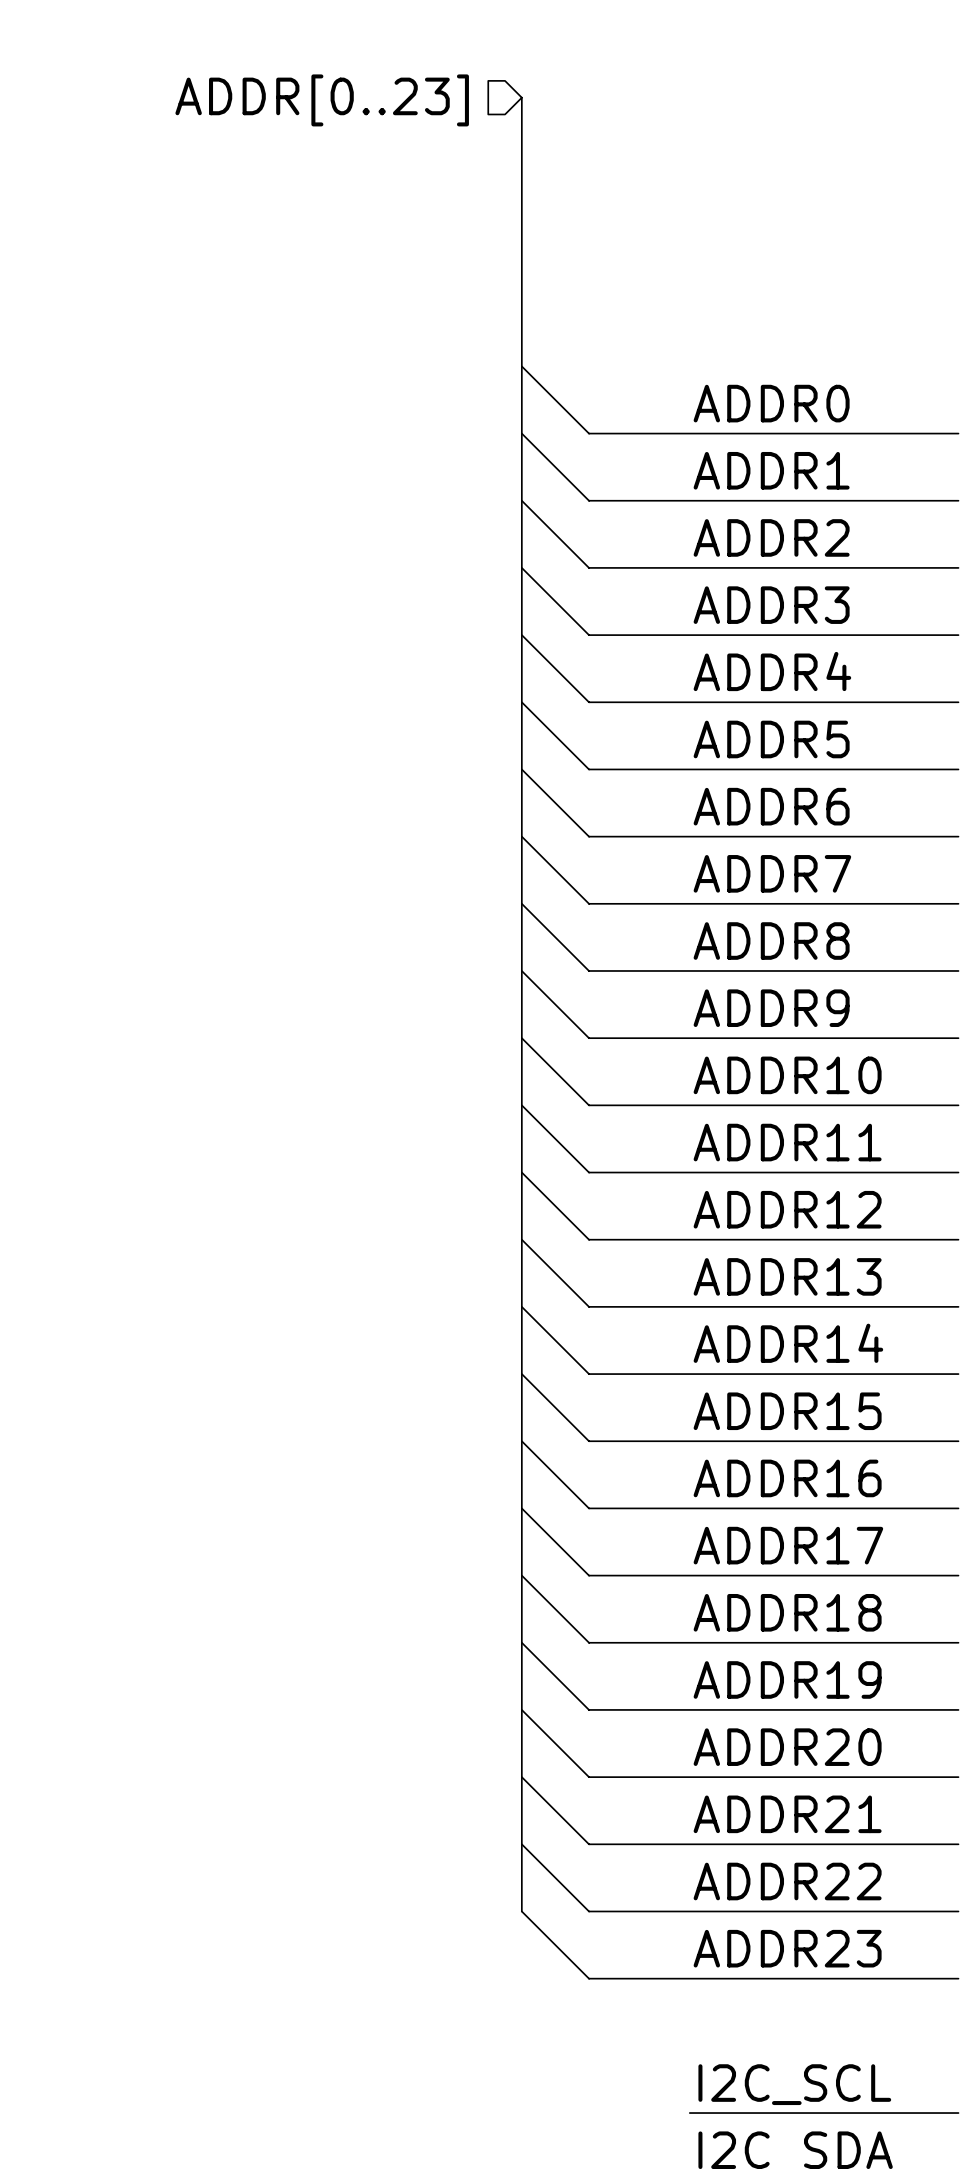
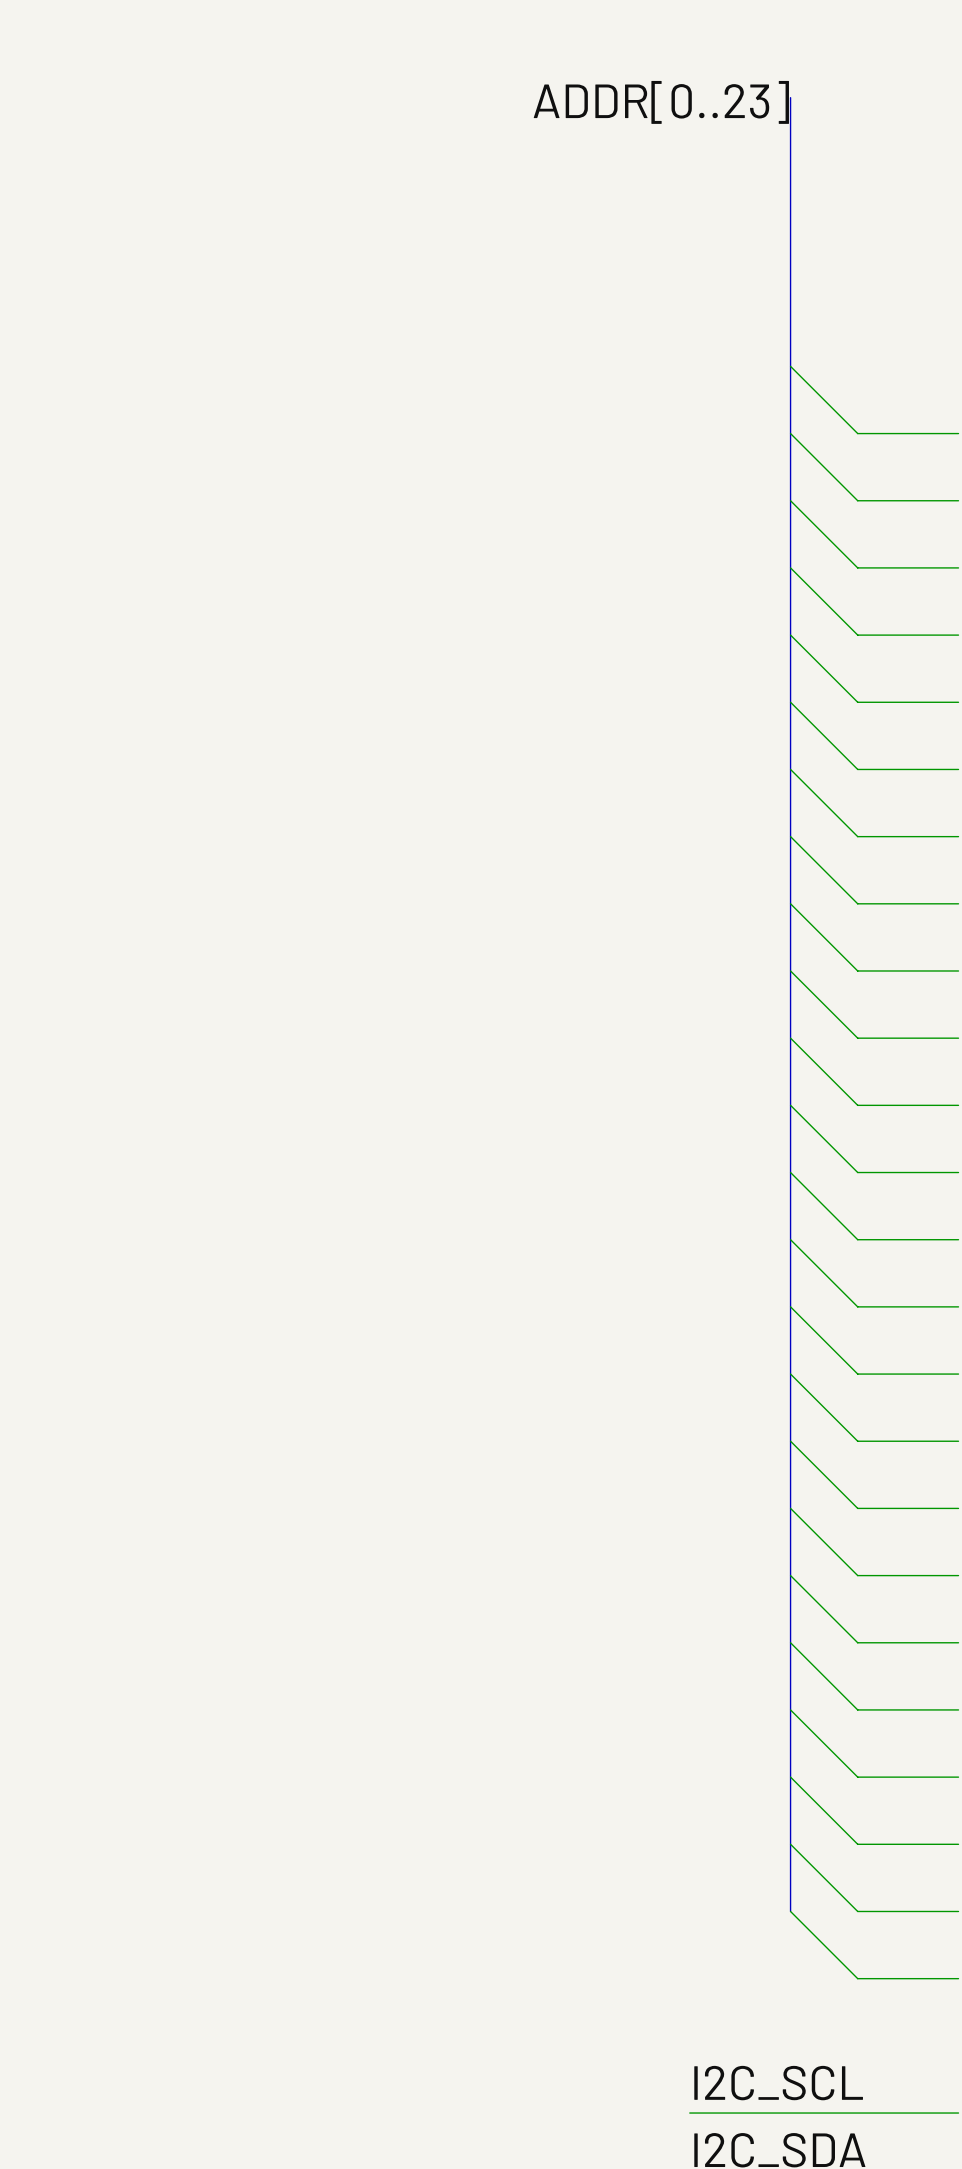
bus: (521, 97) (521, 1911) -> (790, 97) (790, 1911)
hierarchical label: ADDR[0..23] (322, 100) -> none
label: none -> ADDR[0..23] (661, 102)
wire: (521, 366) (589, 433) (857, 433) -> (790, 366) (857, 433)
label: ADDR0 (771, 403) -> none
wire: (521, 433) (589, 500) (857, 500) -> (790, 433) (857, 500)
label: ADDR1 (771, 470) -> none
wire: (521, 500) (589, 567) (857, 567) -> (790, 500) (857, 567)
label: ADDR2 (771, 537) -> none
wire: (521, 567) (589, 635) (857, 635) -> (790, 567) (857, 635)
label: ADDR3 (771, 605) -> none
wire: (521, 635) (589, 702) (857, 702) -> (790, 635) (857, 702)
label: ADDR4 (772, 671) -> none
wire: (521, 702) (589, 769) (857, 769) -> (790, 702) (857, 769)
label: ADDR5 (771, 739) -> none
wire: (521, 769) (589, 836) (857, 836) -> (790, 769) (857, 836)
label: ADDR6 (771, 806) -> none
wire: (521, 836) (589, 903) (857, 903) -> (790, 836) (857, 903)
label: ADDR7 (772, 873) -> none
wire: (521, 903) (589, 970) (857, 970) -> (790, 903) (857, 970)
label: ADDR8 (771, 941) -> none
wire: (521, 970) (589, 1038) (857, 1038) -> (790, 970) (857, 1038)
label: ADDR9 (771, 1008) -> none
wire: (521, 1038) (589, 1105) (857, 1105) -> (790, 1038) (857, 1105)
label: ADDR10 (787, 1075) -> none
wire: (521, 1105) (589, 1172) (857, 1172) -> (790, 1105) (857, 1172)
label: ADDR11 (787, 1142) -> none
wire: (521, 1172) (589, 1239) (857, 1239) -> (790, 1172) (857, 1239)
label: ADDR12 (787, 1209) -> none
wire: (521, 1239) (589, 1306) (857, 1306) -> (790, 1239) (857, 1306)
label: ADDR13 (787, 1276) -> none
wire: (521, 1306) (589, 1374) (857, 1374) -> (790, 1306) (857, 1374)
label: ADDR14 (788, 1343) -> none
wire: (521, 1374) (589, 1441) (857, 1441) -> (790, 1374) (857, 1441)
label: ADDR15 (787, 1411) -> none
wire: (521, 1441) (589, 1508) (857, 1508) -> (790, 1441) (857, 1508)
label: ADDR16 (787, 1478) -> none
wire: (521, 1508) (589, 1575) (857, 1575) -> (790, 1508) (857, 1575)
label: ADDR17 (788, 1545) -> none
wire: (521, 1575) (589, 1642) (857, 1642) -> (790, 1575) (857, 1642)
label: ADDR18 (787, 1612) -> none
wire: (521, 1642) (589, 1709) (857, 1709) -> (790, 1642) (857, 1709)
label: ADDR19 (787, 1679) -> none
wire: (521, 1709) (589, 1777) (857, 1777) -> (790, 1709) (857, 1777)
label: ADDR20 (787, 1747) -> none
wire: (521, 1777) (589, 1844) (857, 1844) -> (790, 1777) (857, 1844)
label: ADDR21 (787, 1814) -> none
wire: (521, 1844) (589, 1911) (857, 1911) -> (790, 1844) (857, 1911)
label: ADDR22 (787, 1881) -> none
wire: (521, 1911) (589, 1978) (857, 1978) -> (790, 1911) (857, 1978)
label: ADDR23 (787, 1948) -> none

